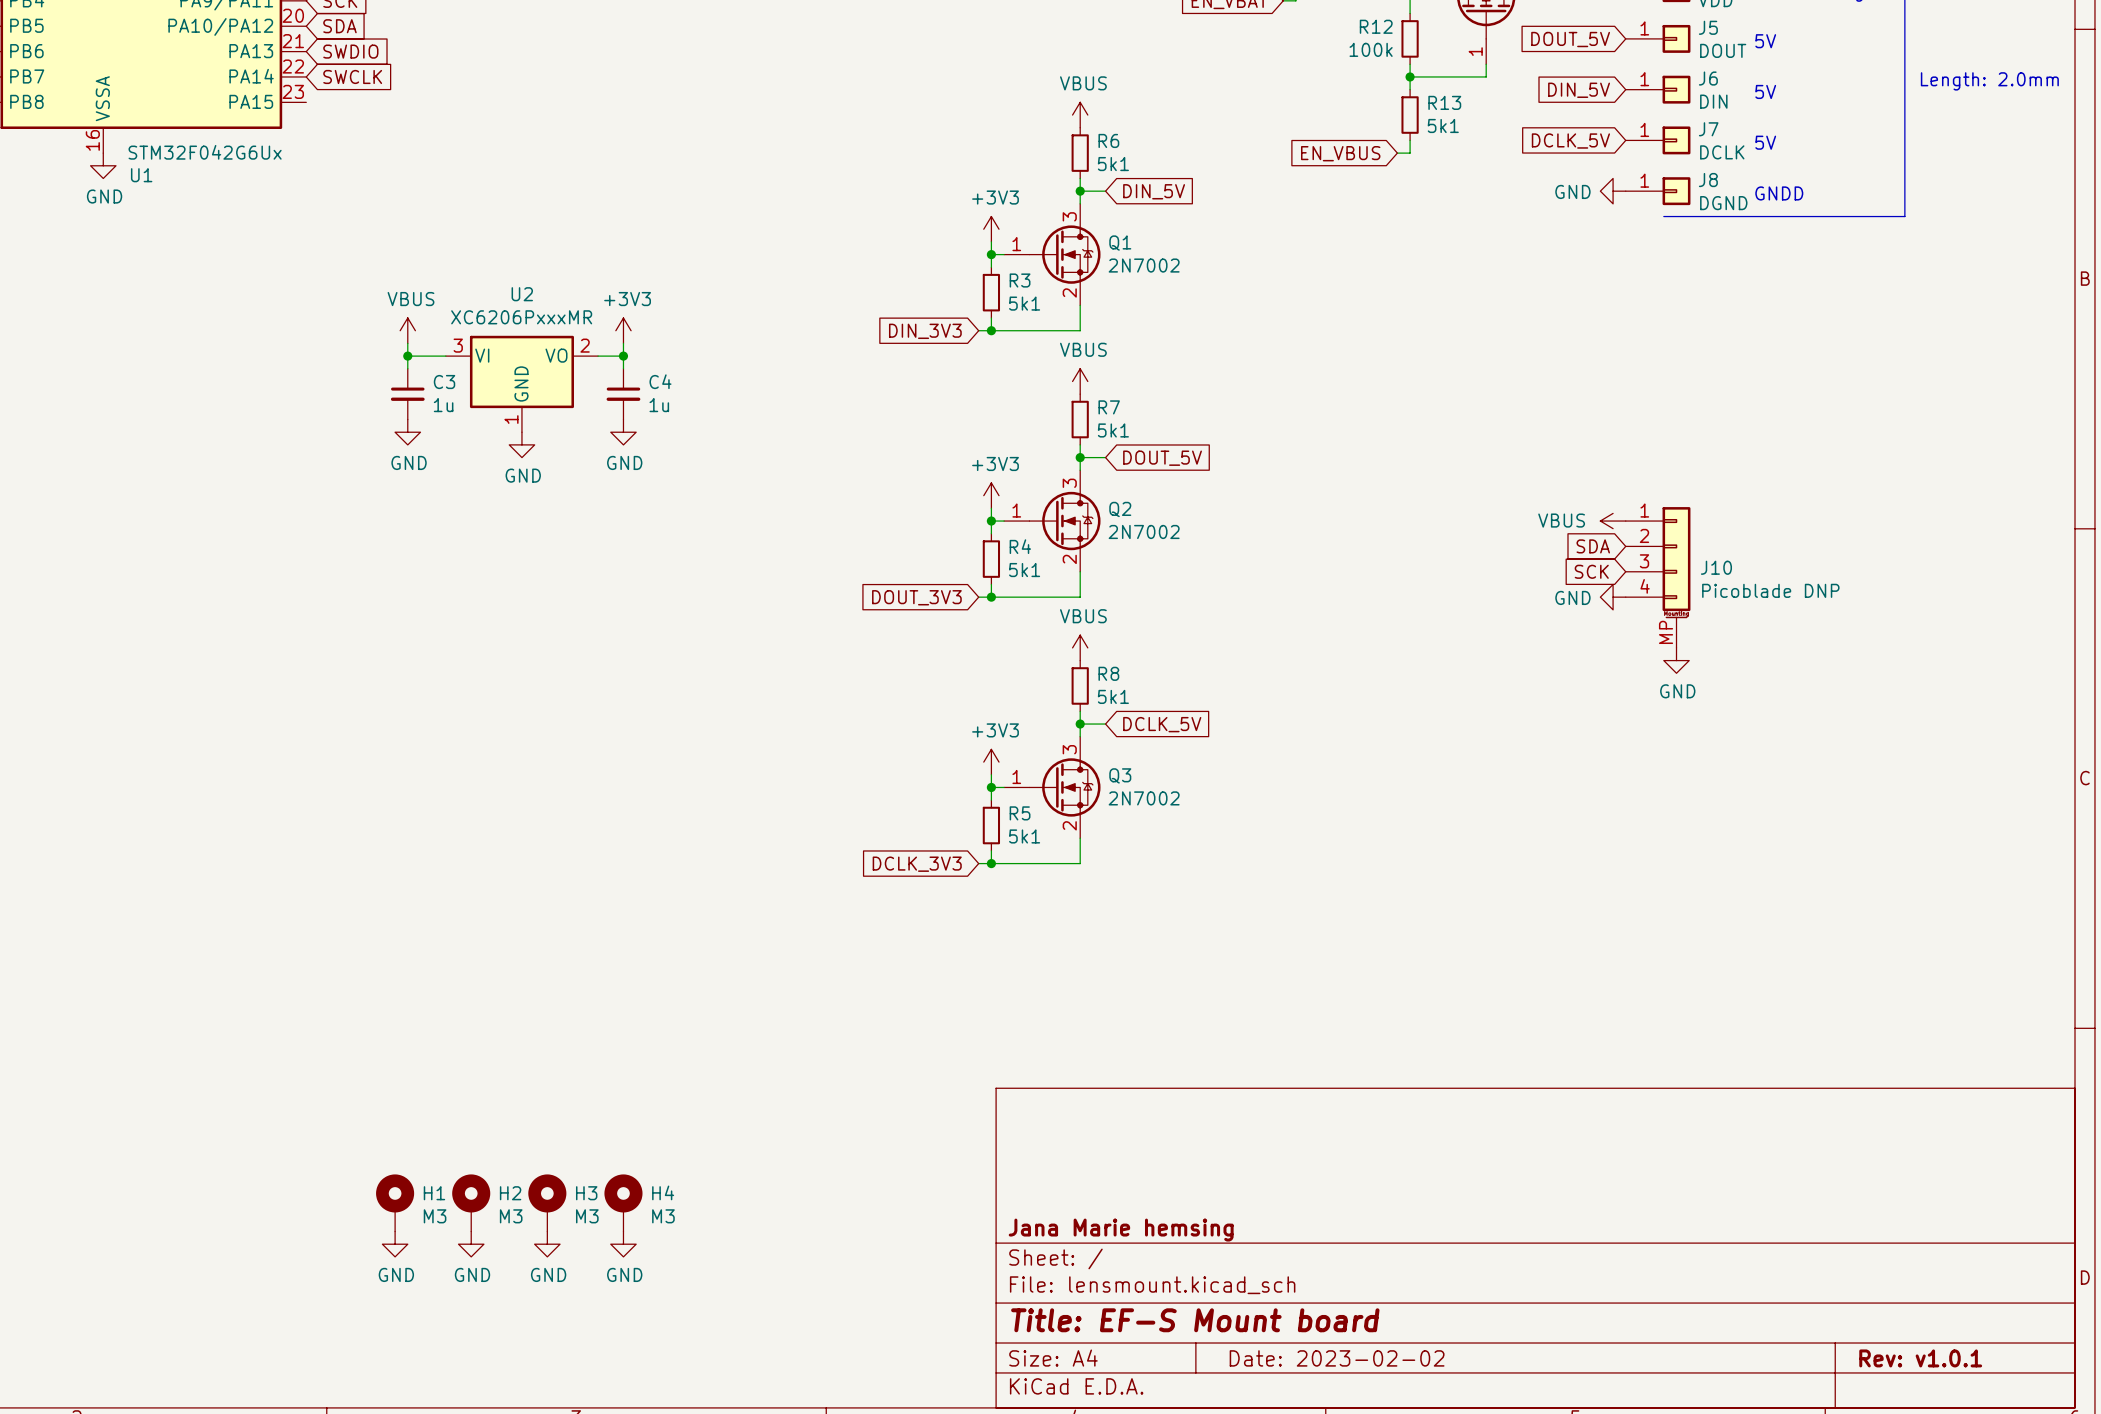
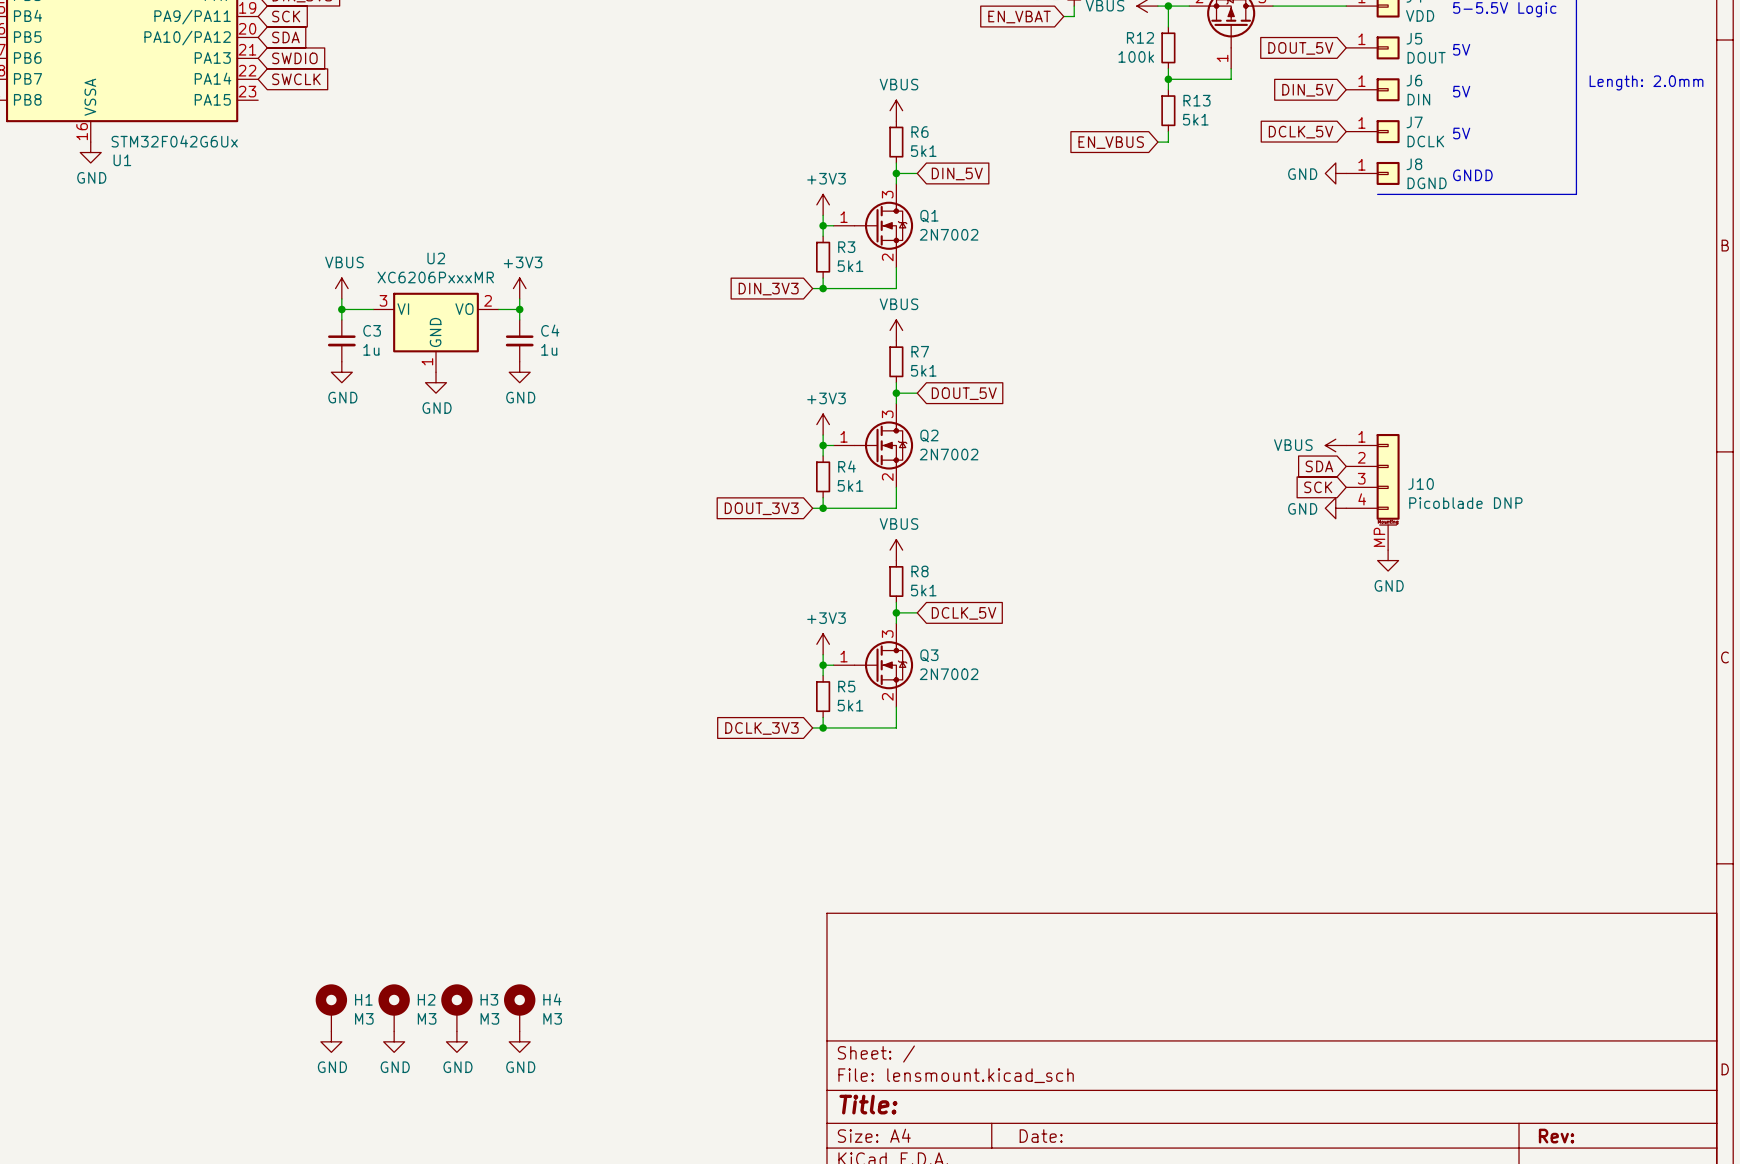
title block: Jana Marie hemsing (1121, 1230) -> none
title block: Title: EF-S Mount board (1195, 1320) -> Title: (868, 1104)
title block: Date: 2023-02-02 (1337, 1358) -> Date: (1041, 1136)
title block: Rev: v1.0.1 (1920, 1358) -> Rev: (1556, 1136)

